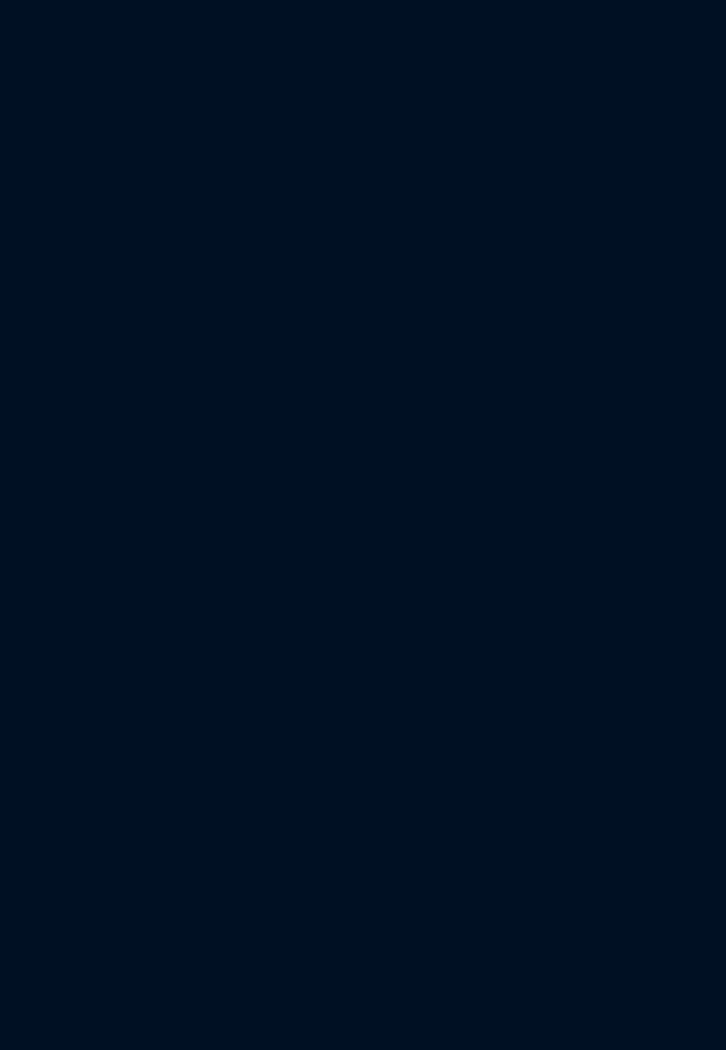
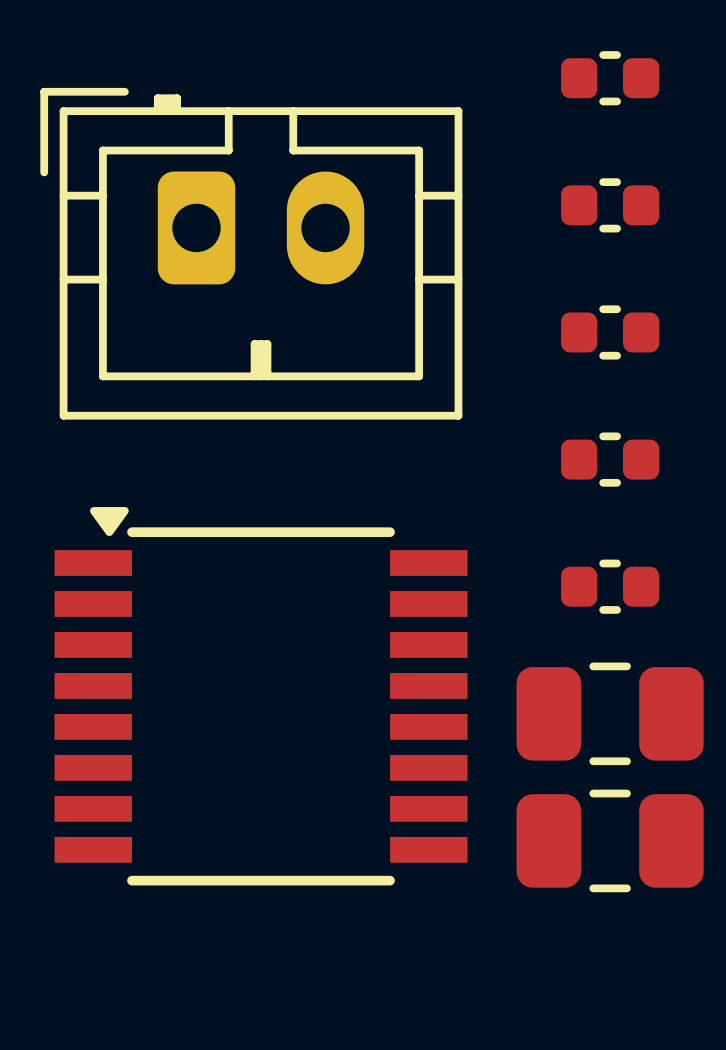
part: none -> (610, 78)
part: none -> (610, 205)
part: none -> (251, 253)
part: none -> (610, 332)
part: none -> (610, 459)
part: none -> (610, 586)
part: none -> (261, 696)
part: none -> (610, 713)
part: none -> (610, 840)

